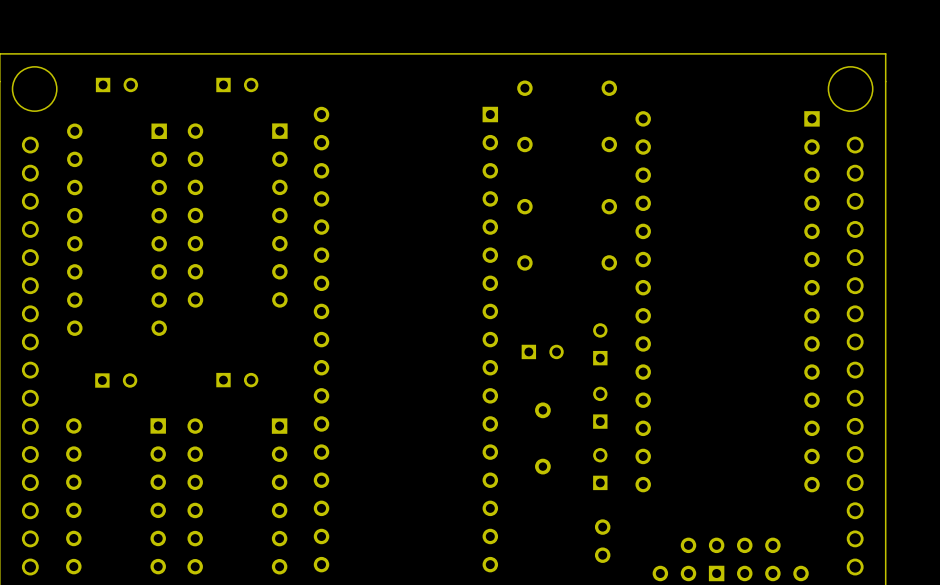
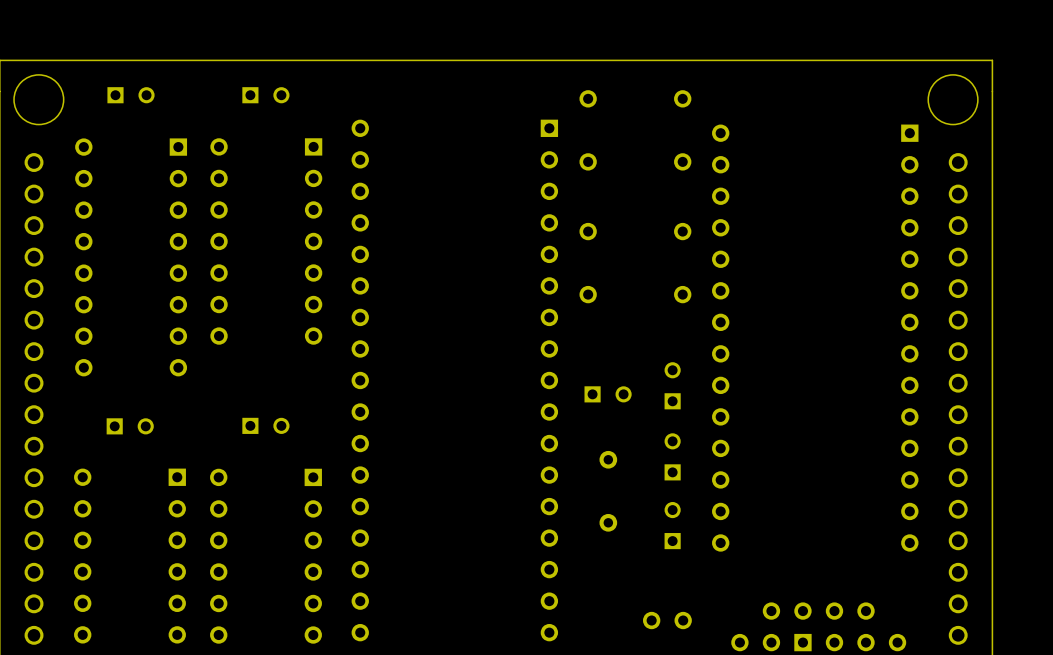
part rotation: 0° (602, 541) -> 90° clockwise (667, 620)

